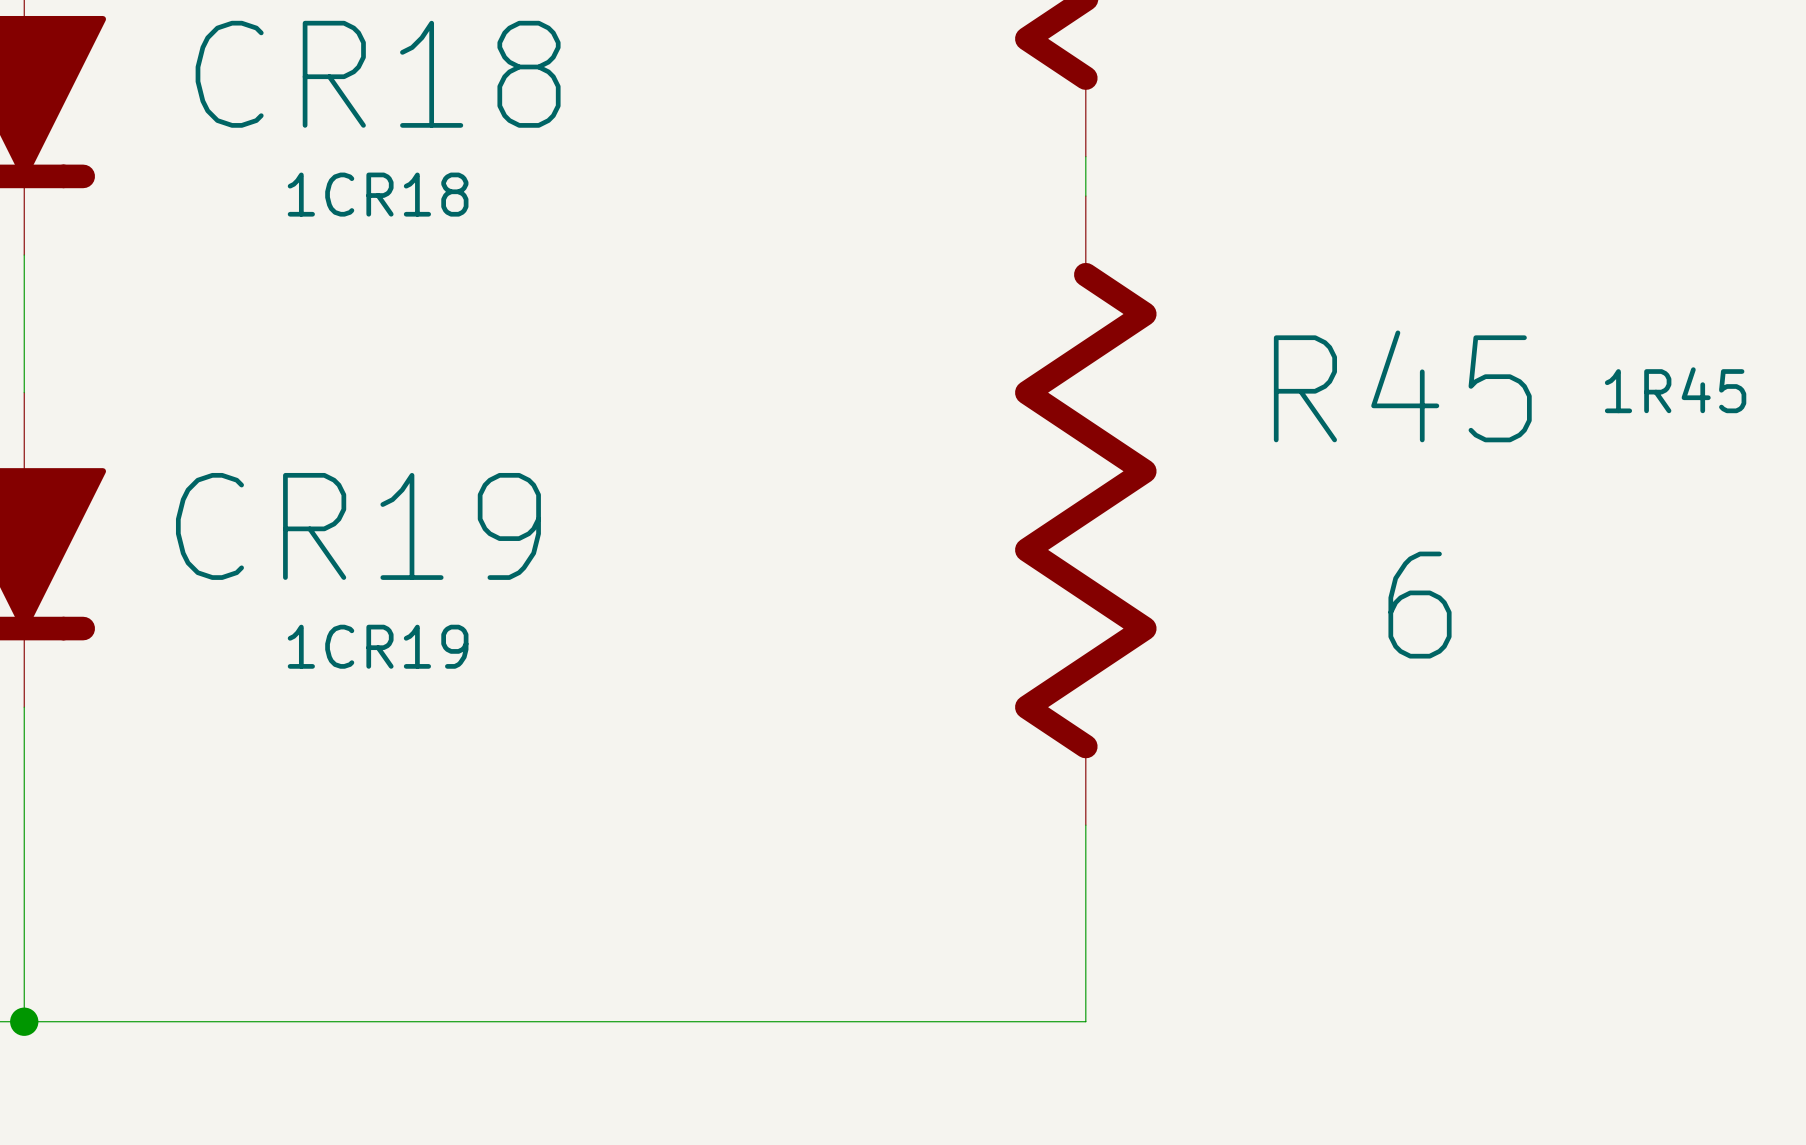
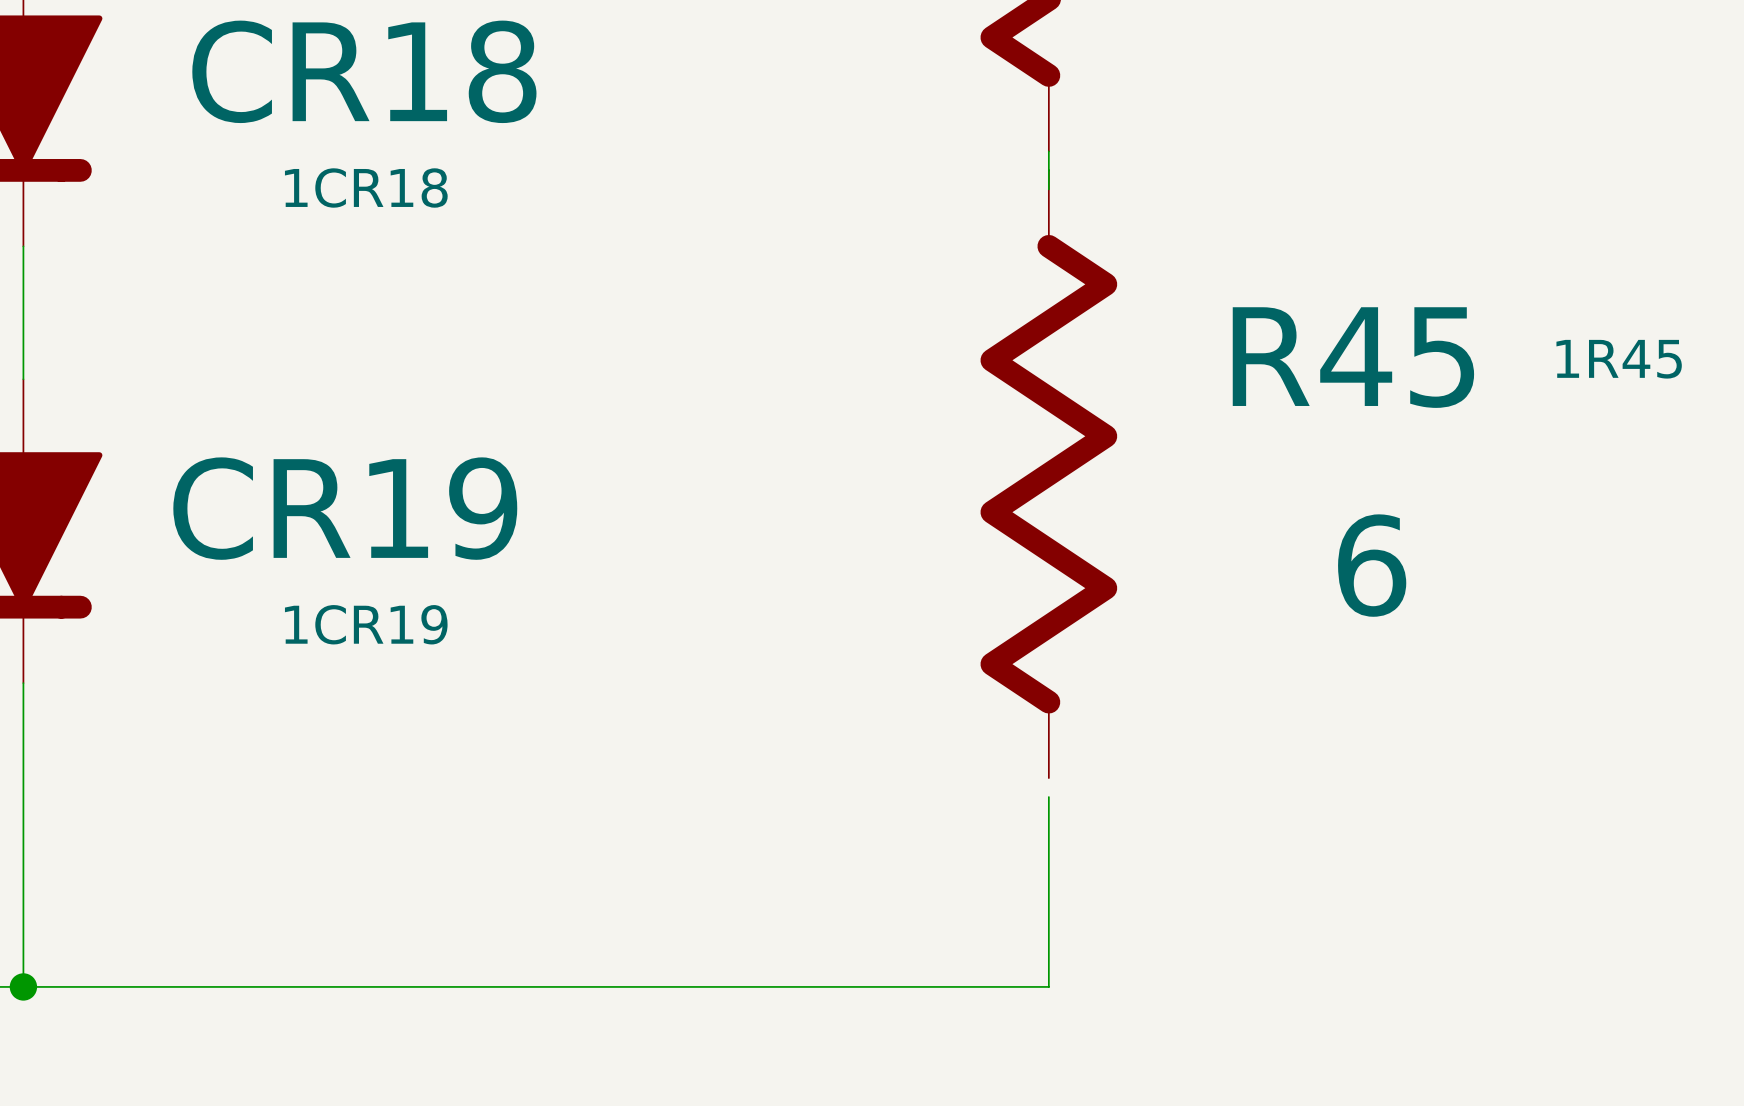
1R45 position: (1085, 510) -> (1048, 474)

